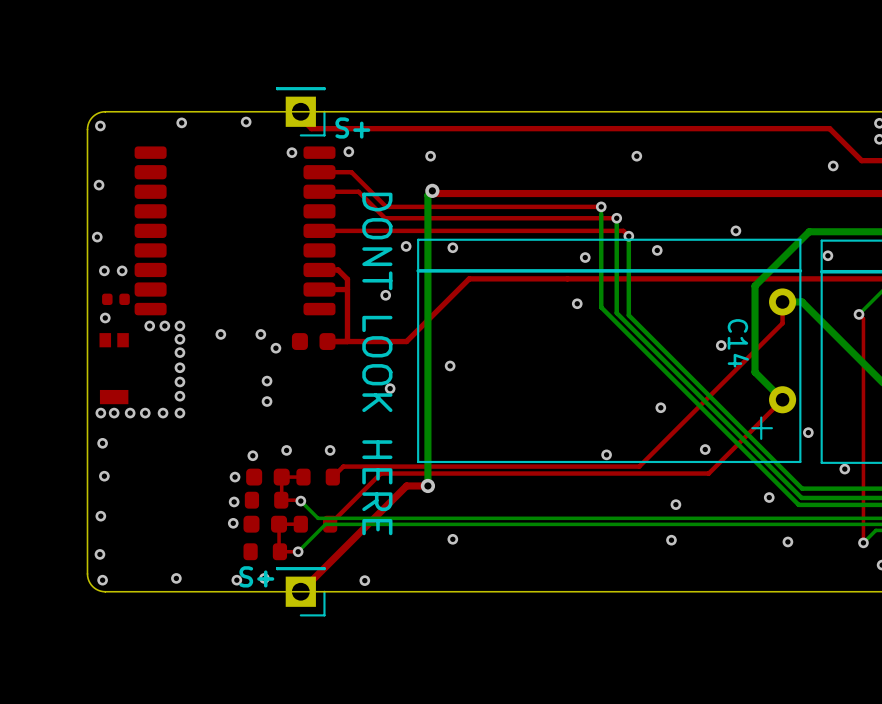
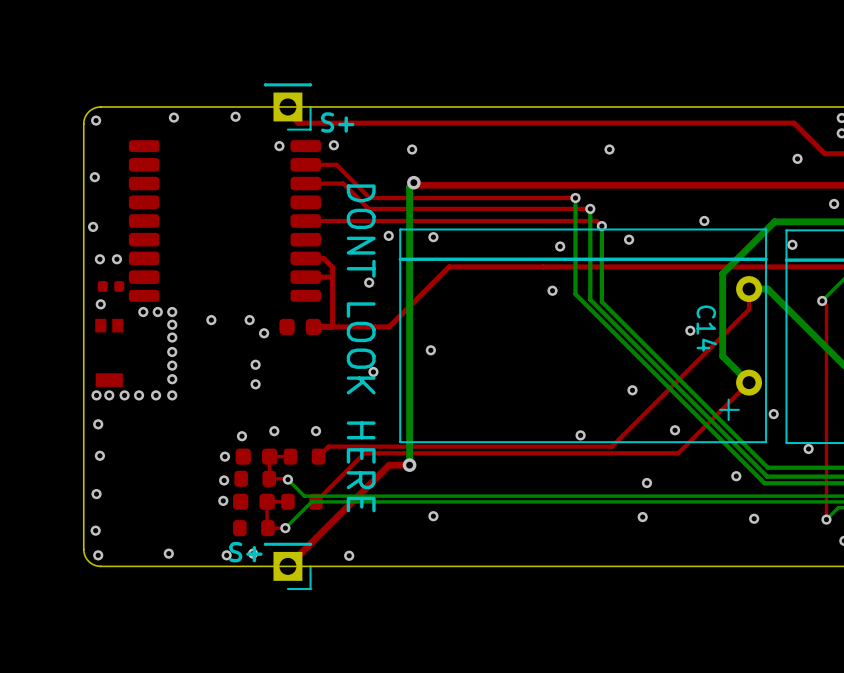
via: none -> (834, 203)

